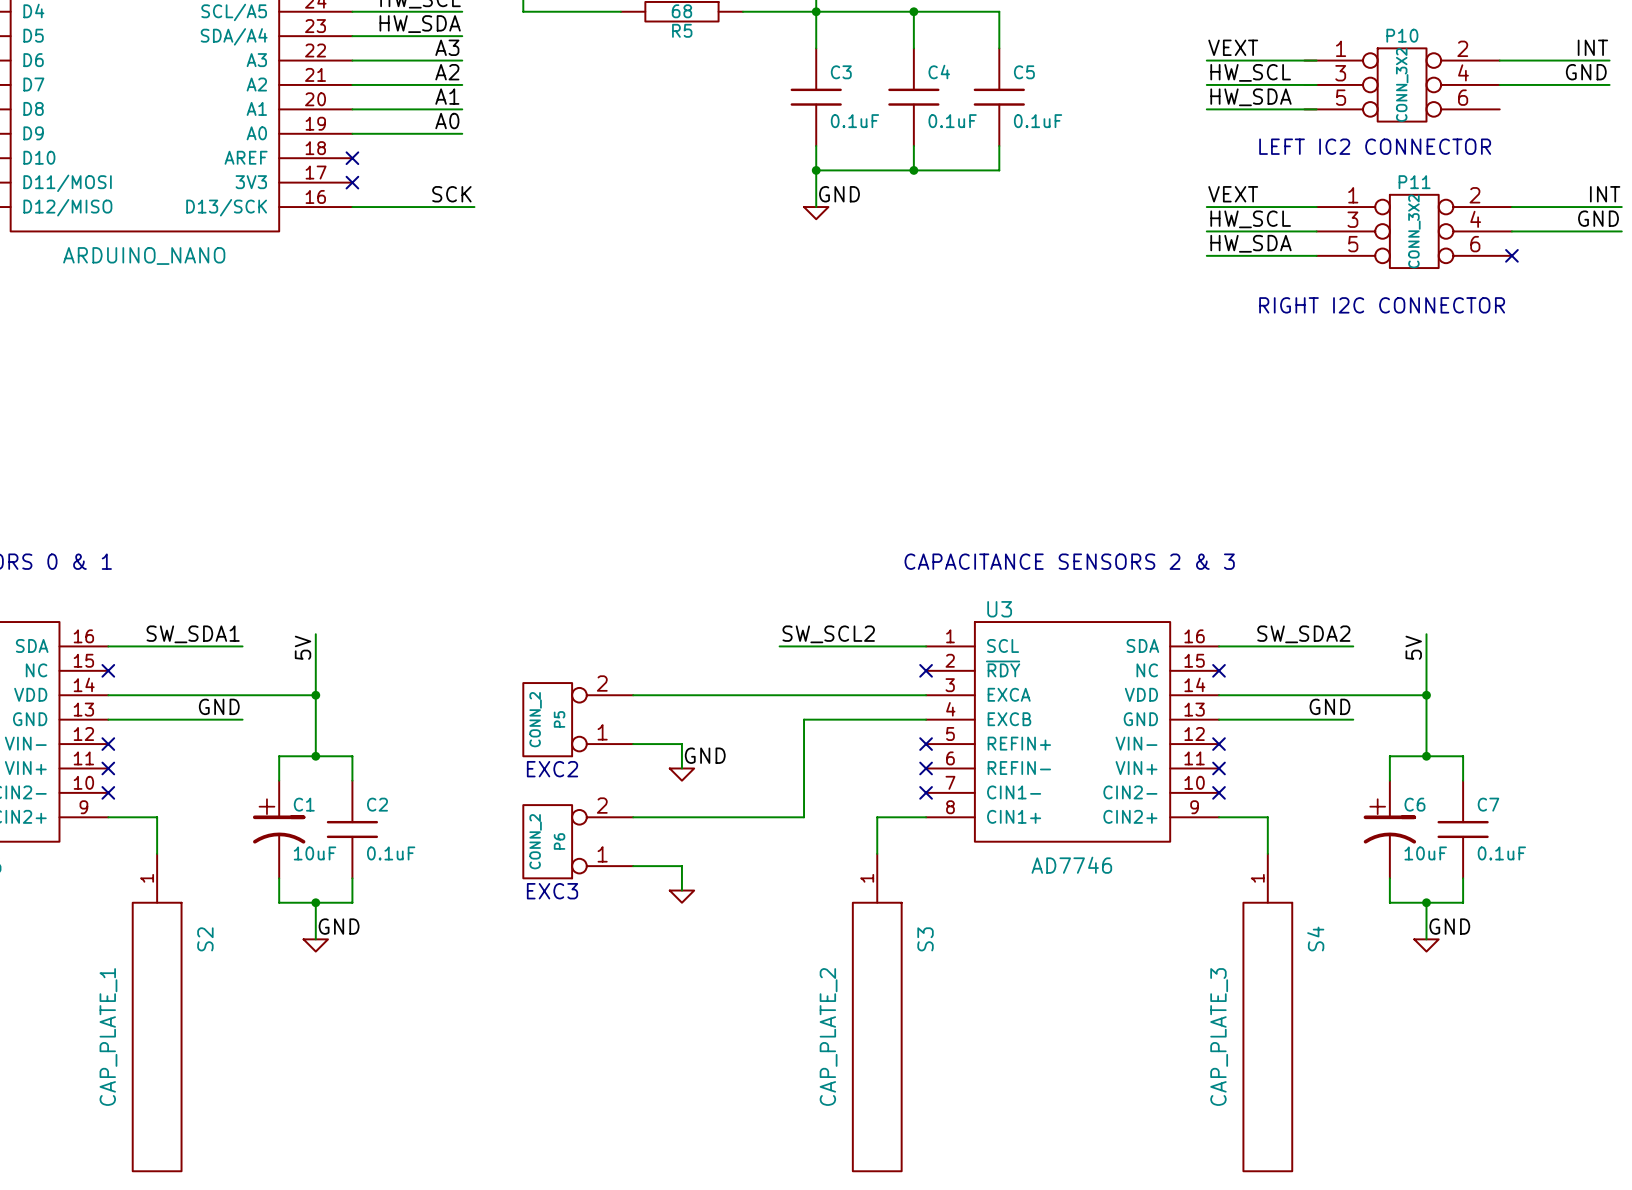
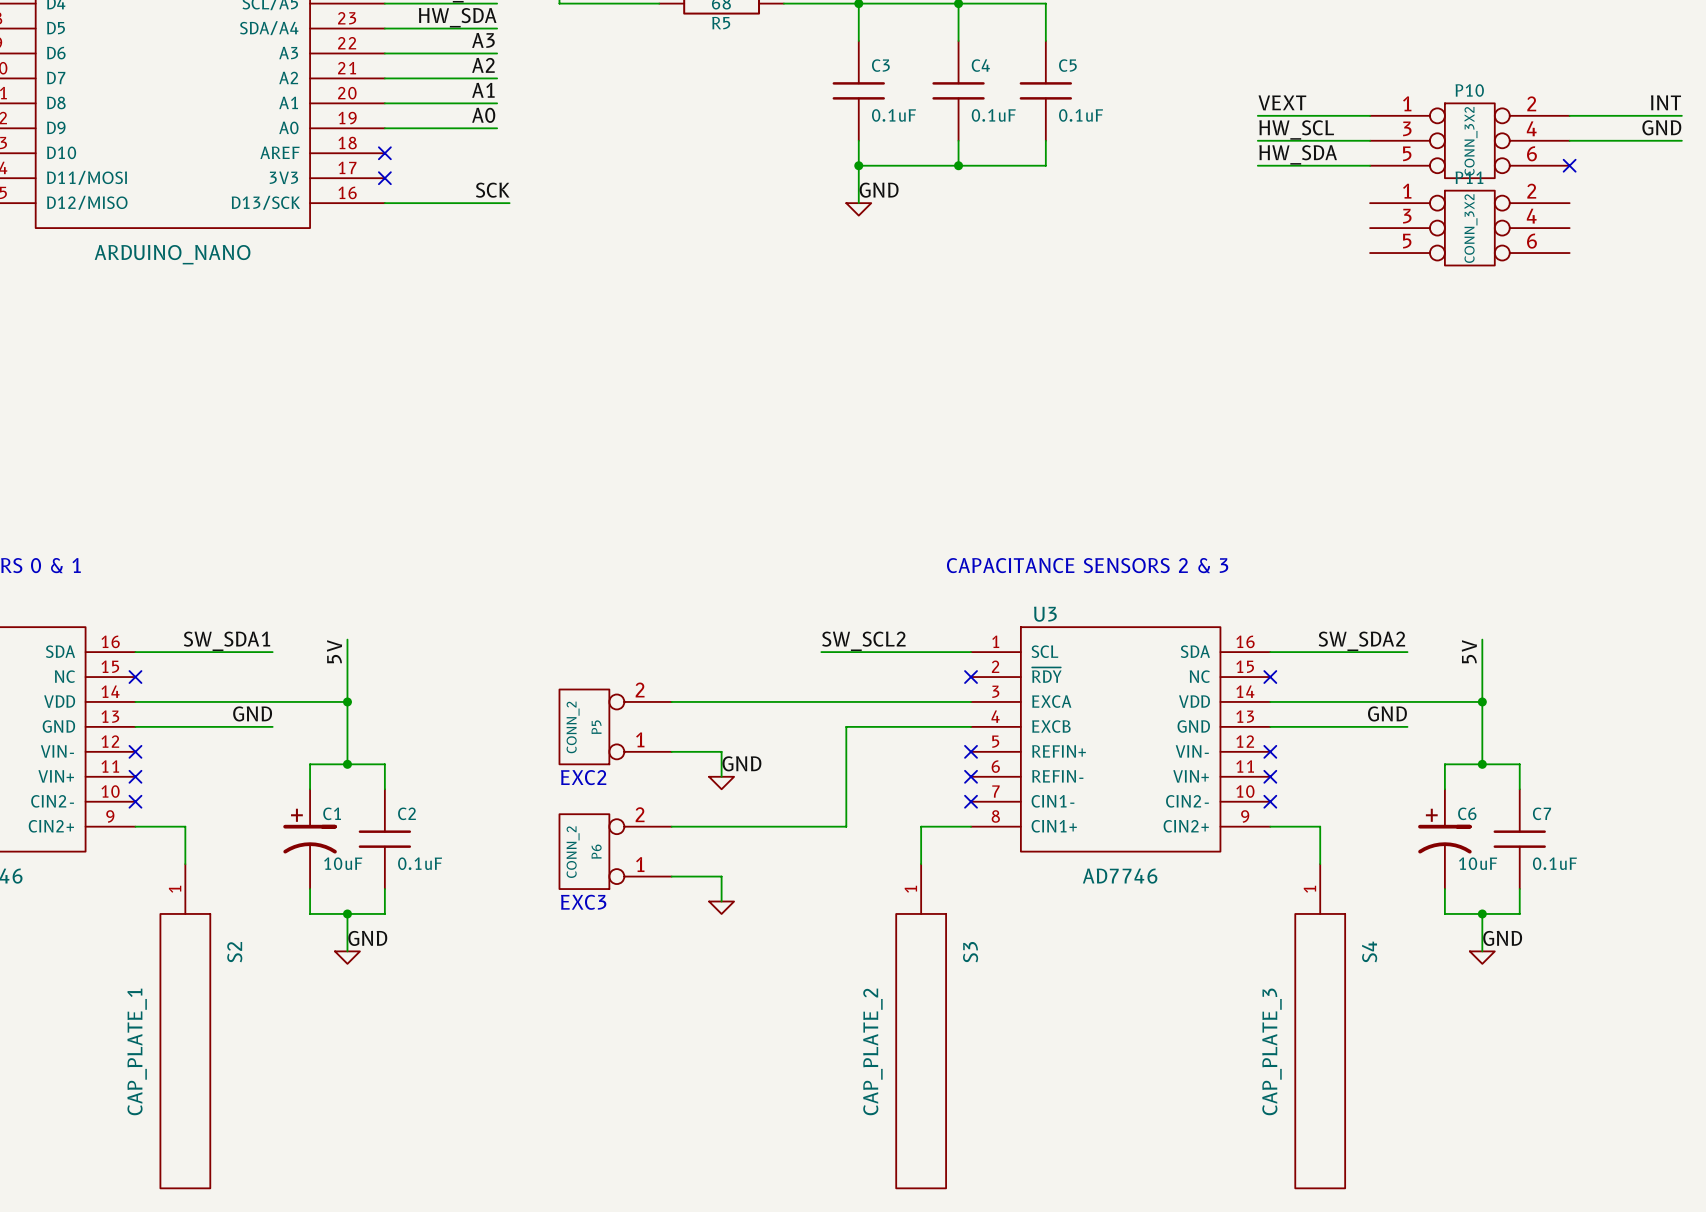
label: VEXT (1233, 47) -> none
label: INT (1592, 47) -> none
wire: (1206, 60) (1316, 60) -> none
wire: (1499, 60) (1609, 60) -> none
label: HW_SCL (1250, 72) -> none
label: GND (1586, 72) -> none
wire: (1206, 84) (1316, 84) -> none
P10 position: (1402, 84) -> (1469, 140)
wire: (1499, 84) (1609, 84) -> none
label: HW_SDA (1251, 97) -> none
label: none -> VEXT (1282, 102)
label: none -> INT (1665, 102)
wire: (1206, 109) (1316, 109) -> none
label: none -> HW_SCL (1296, 129)
label: none -> GND (1661, 127)
text: LEFT IC2 CONNECTOR (1375, 146) -> none
label: none -> HW_SDA (1298, 154)
no-connect mark: none -> (1569, 165)
label: VEXT (1233, 194) -> none
label: INT (1605, 194) -> none
wire: (1206, 207) (1316, 207) -> (1257, 115) (1370, 115)
wire: (1511, 207) (1621, 207) -> (1569, 115) (1681, 115)
label: GND (1598, 218) -> none
label: HW_SCL (1250, 219) -> none
wire: (1206, 231) (1316, 231) -> (1257, 140) (1370, 140)
wire: (1511, 231) (1621, 231) -> (1569, 140) (1681, 140)
label: HW_SDA (1251, 243) -> none
wire: (1206, 255) (1316, 255) -> (1257, 165) (1370, 165)
no-connect mark: (1511, 255) -> none
text: RIGHT I2C CONNECTOR (1382, 305) -> none

